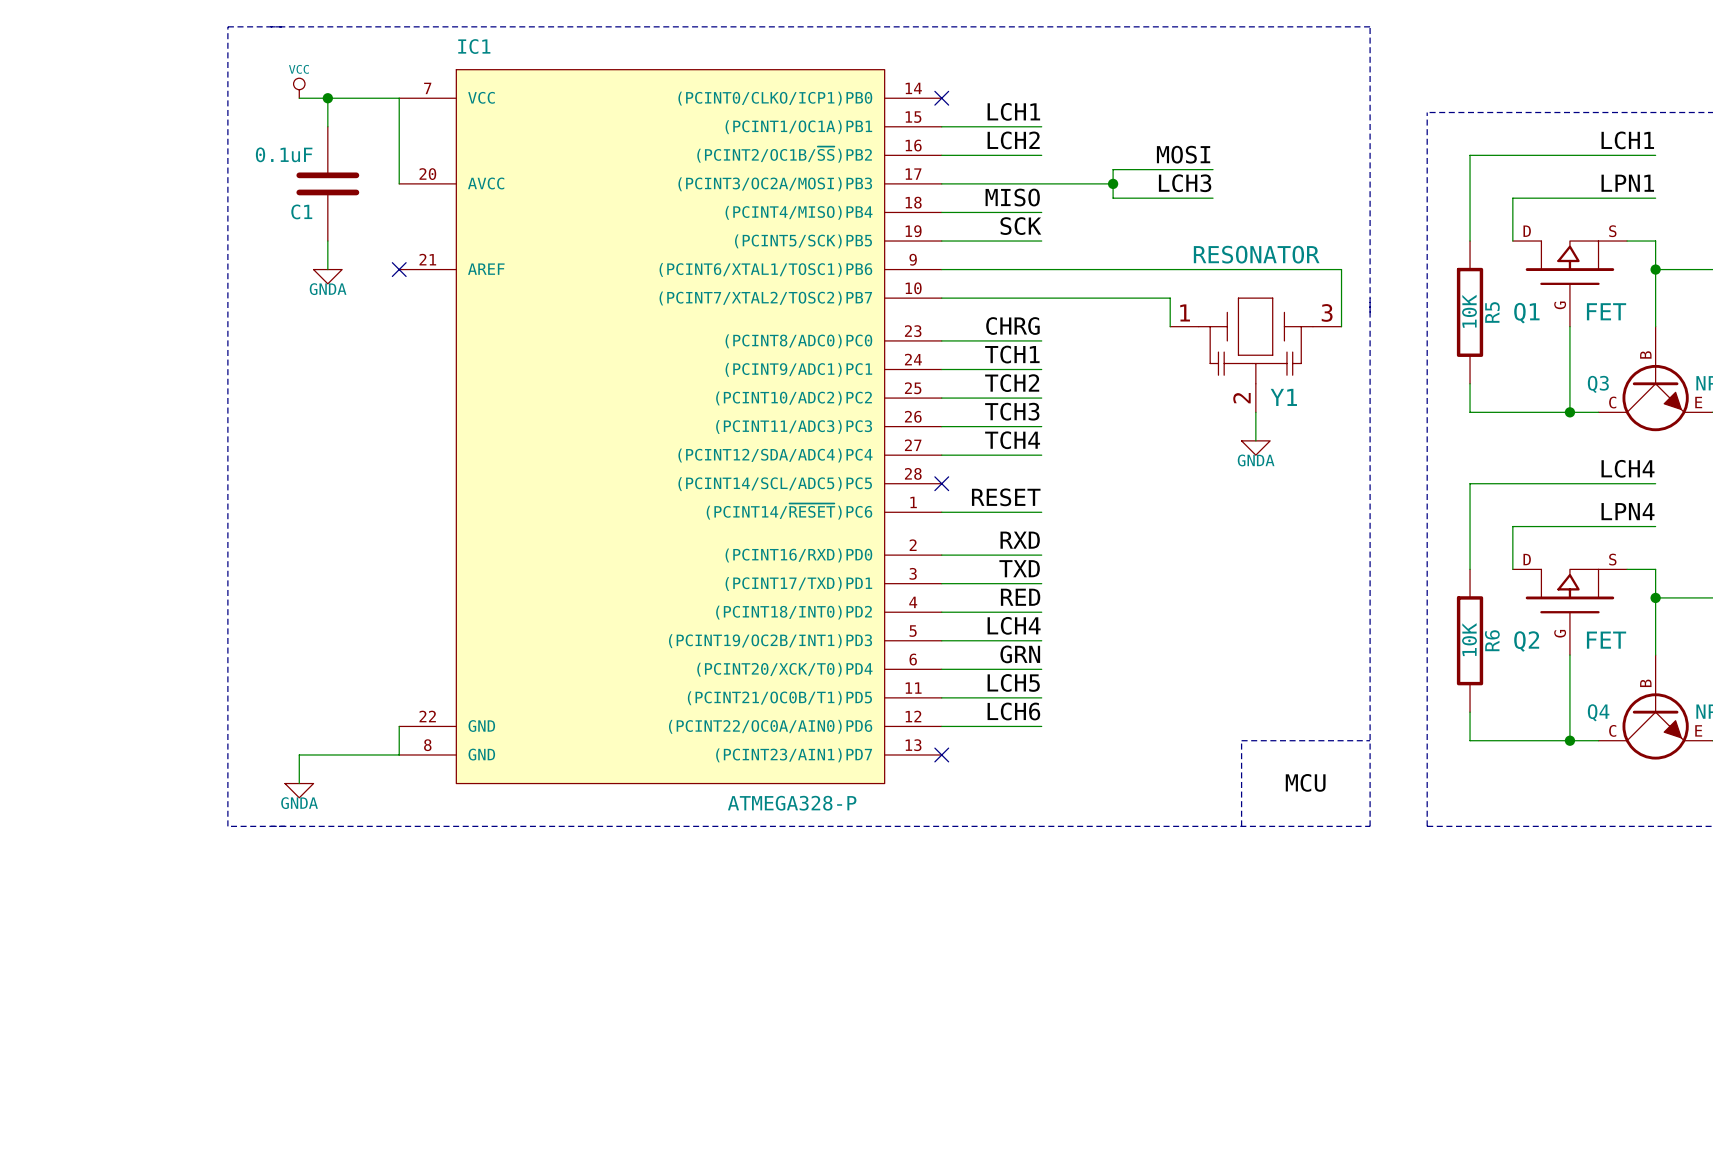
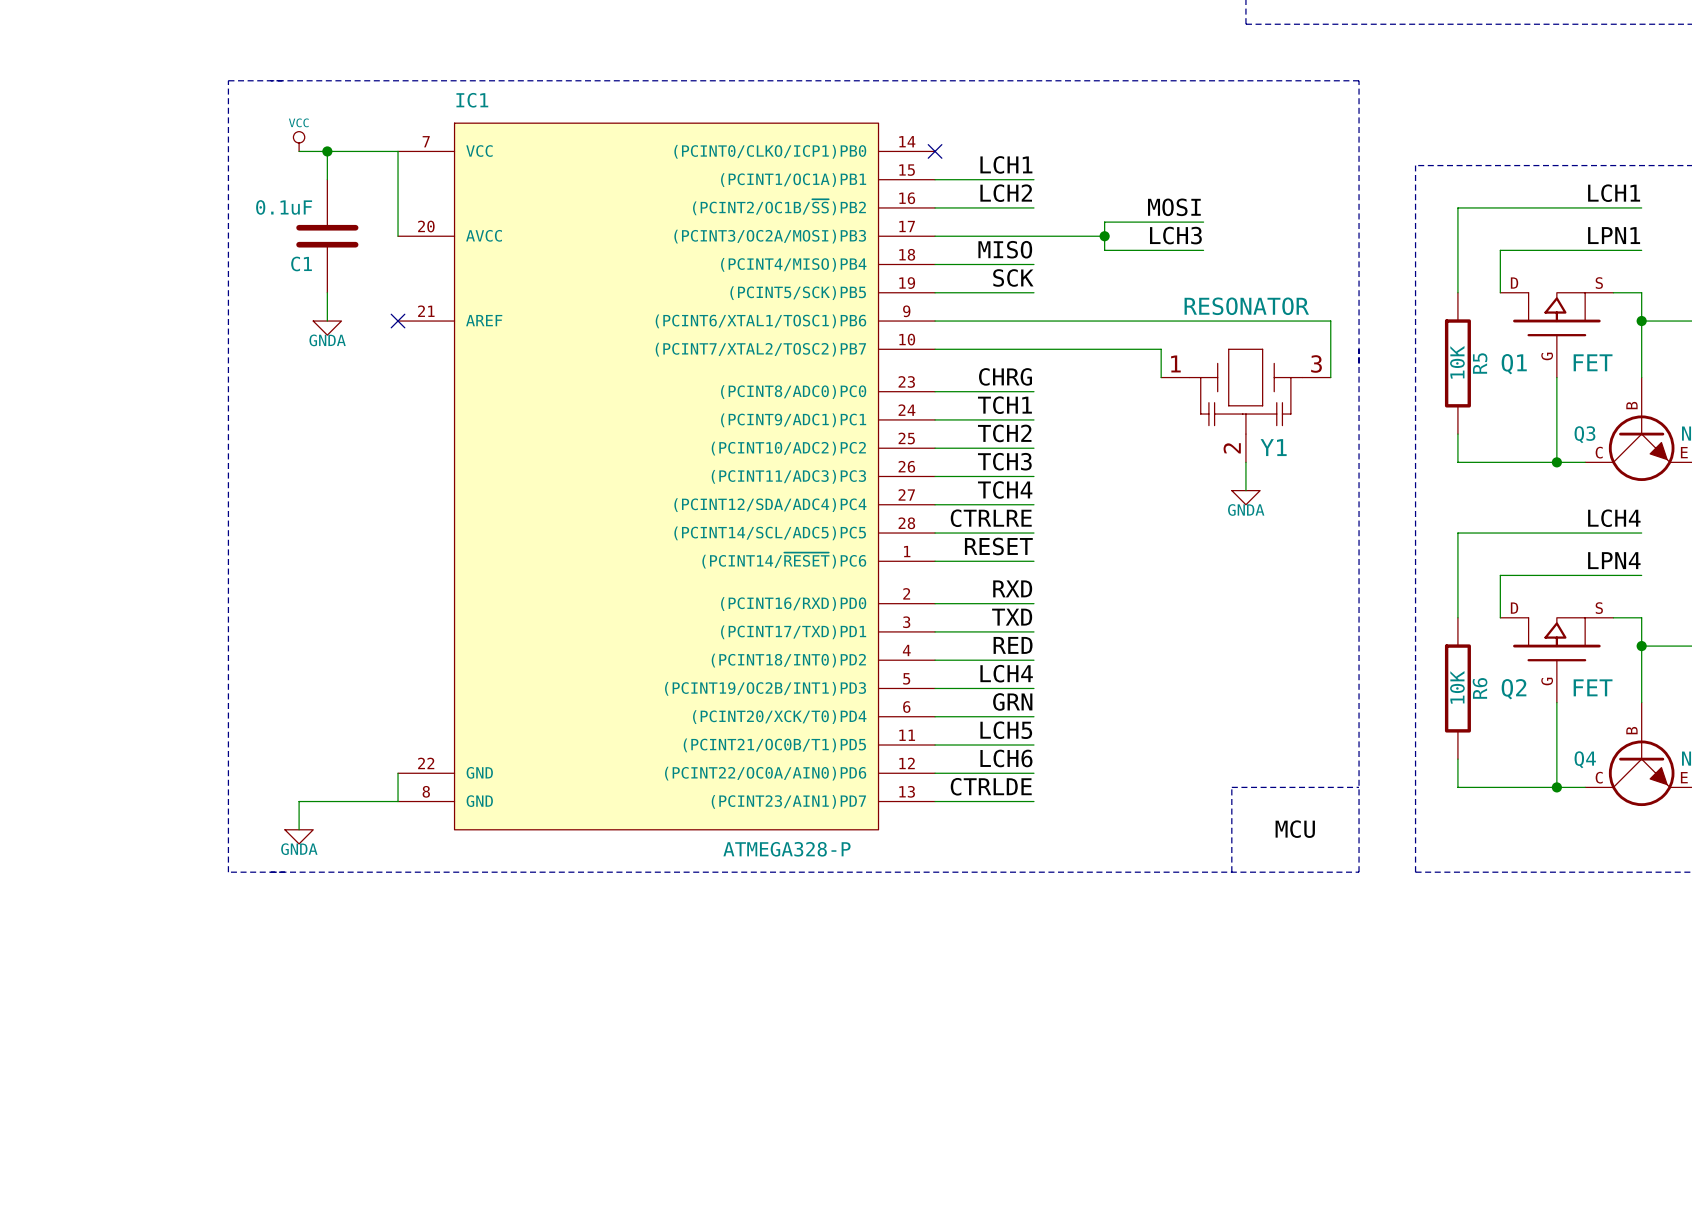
label: none -> CTRLRE (991, 518)
wire: none -> (935, 533) (1033, 533)
no-connect mark: (941, 483) -> none
label: none -> CTRLDE (991, 786)
wire: none -> (935, 801) (1033, 801)
no-connect mark: (941, 754) -> none

